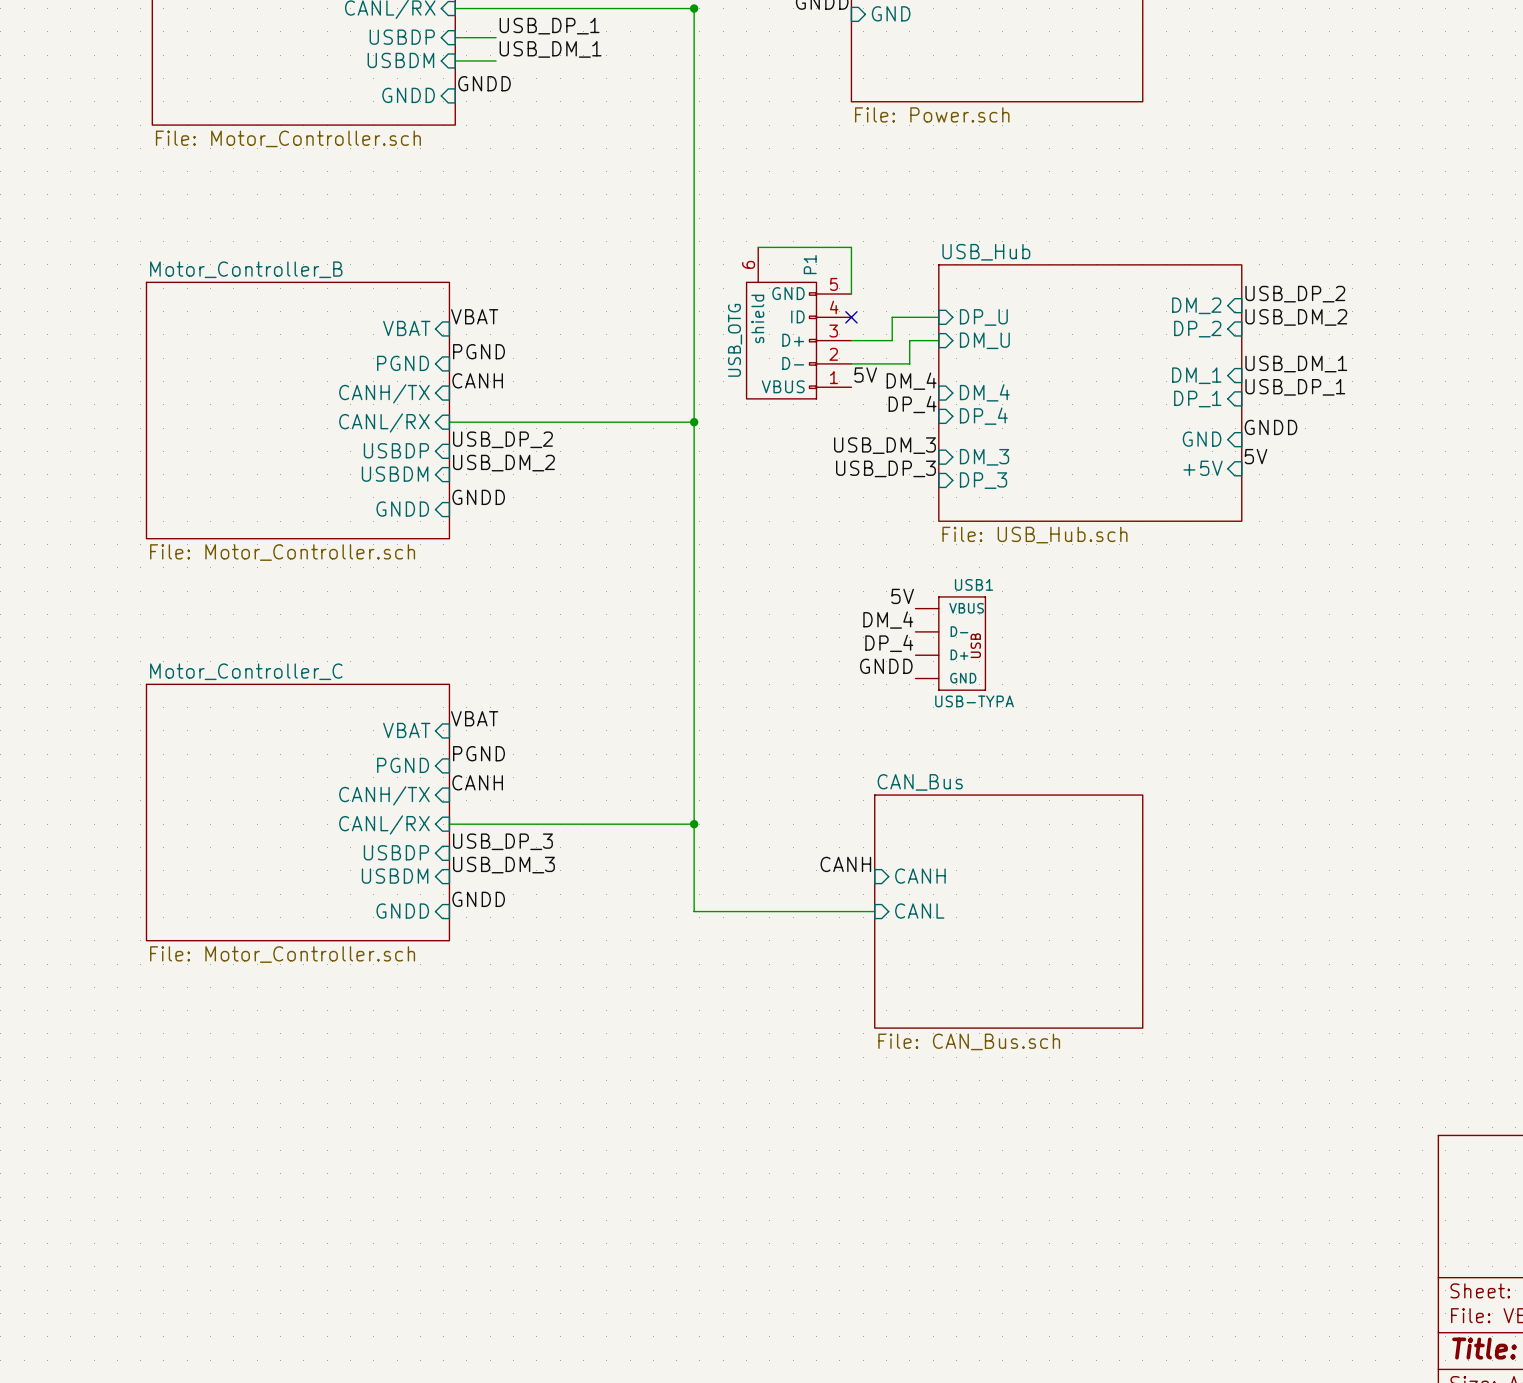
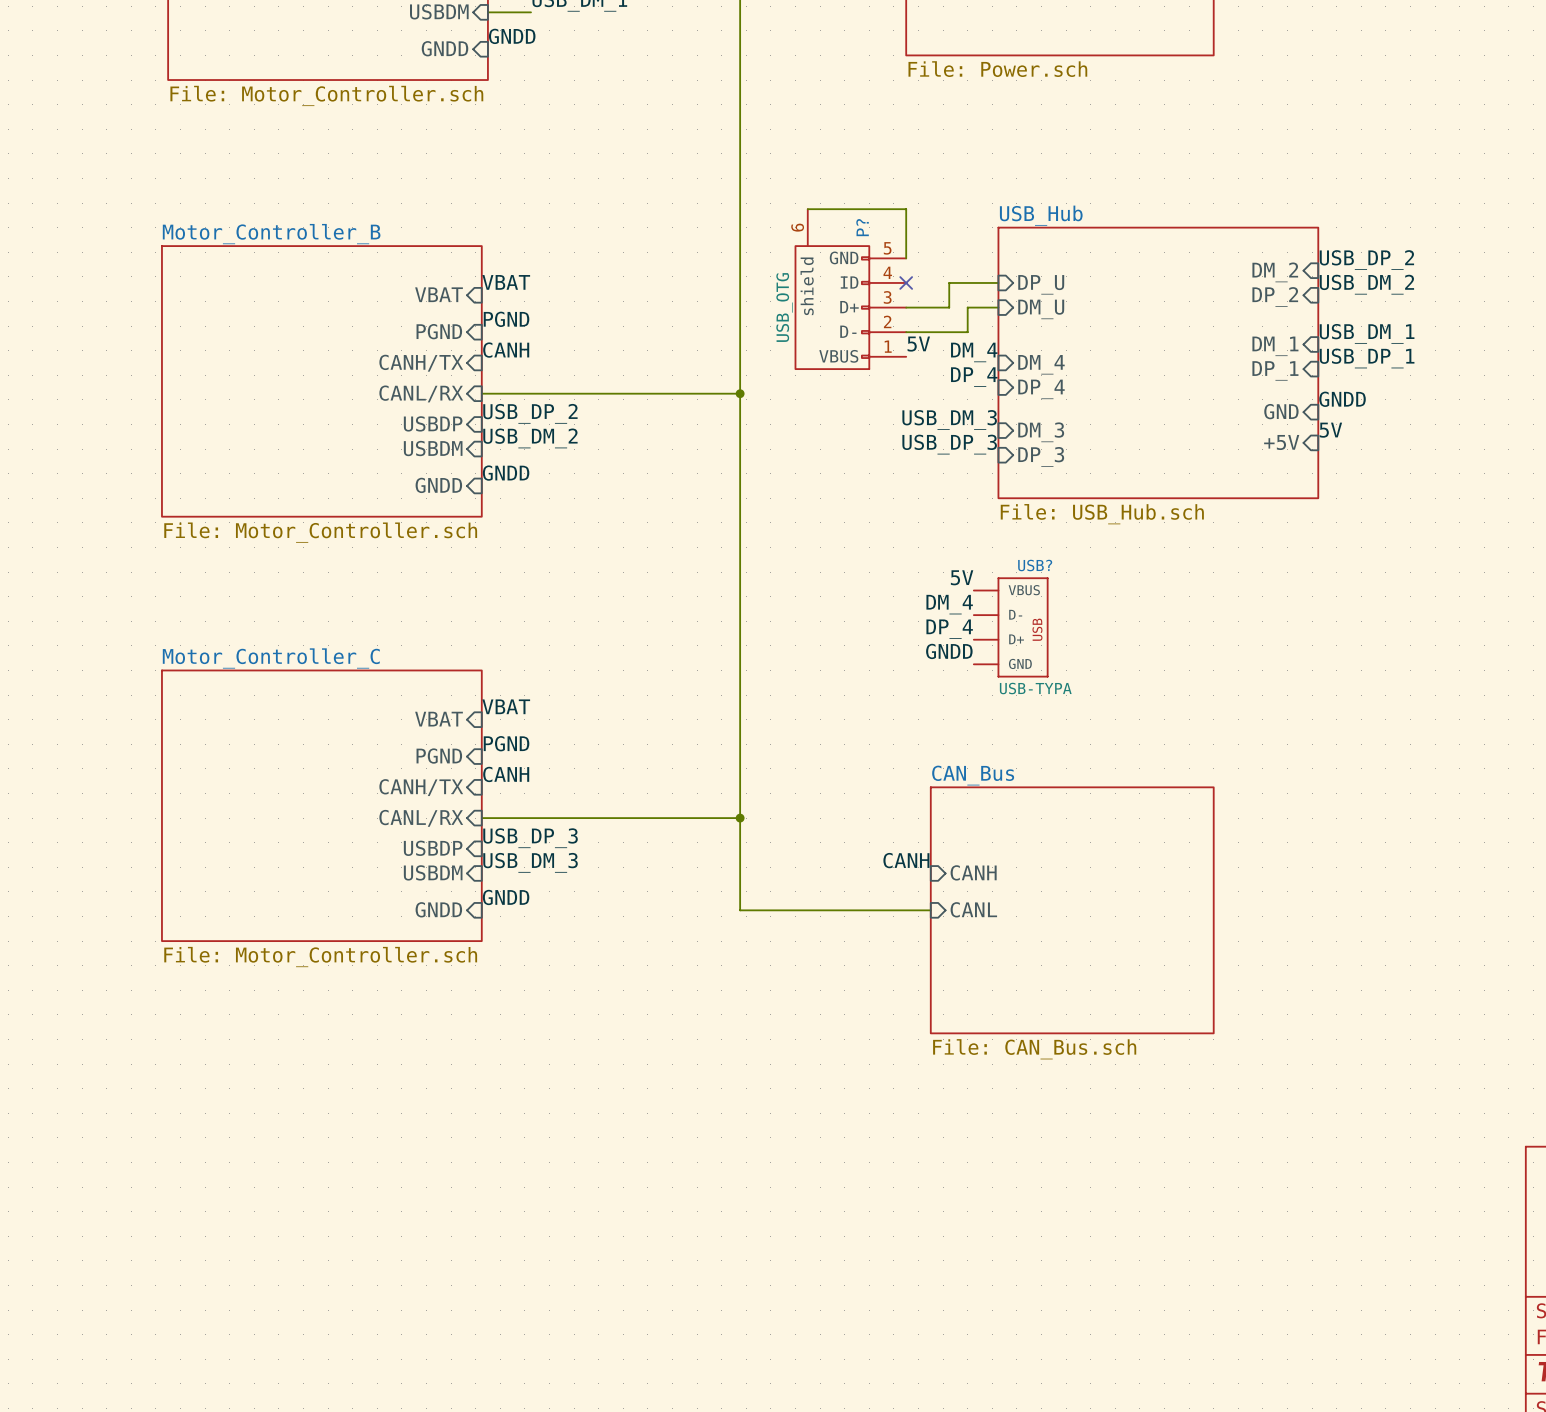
P1 name: P1 (810, 264) -> P? (862, 227)
USB1 name: USB1 (974, 584) -> USB? (1035, 565)

